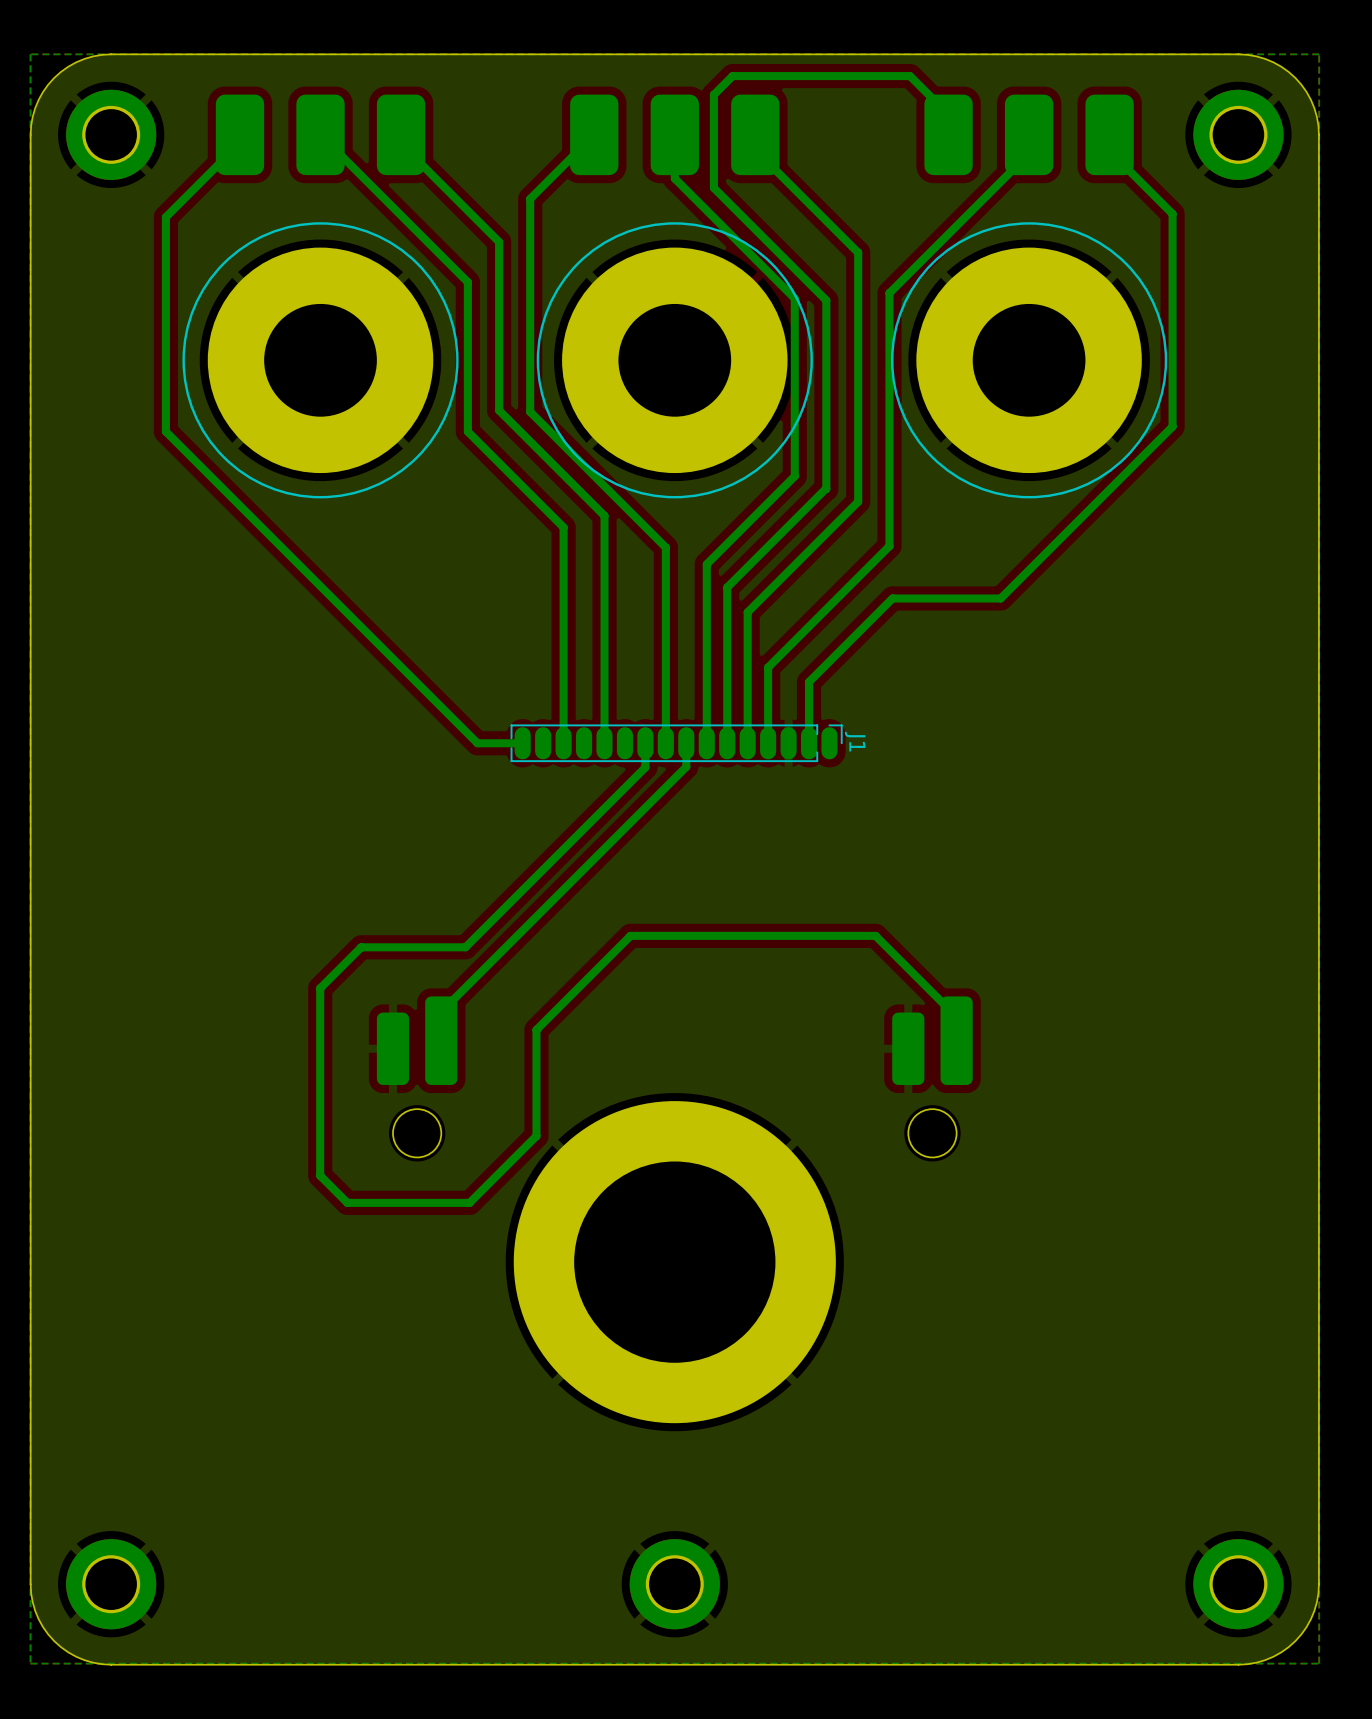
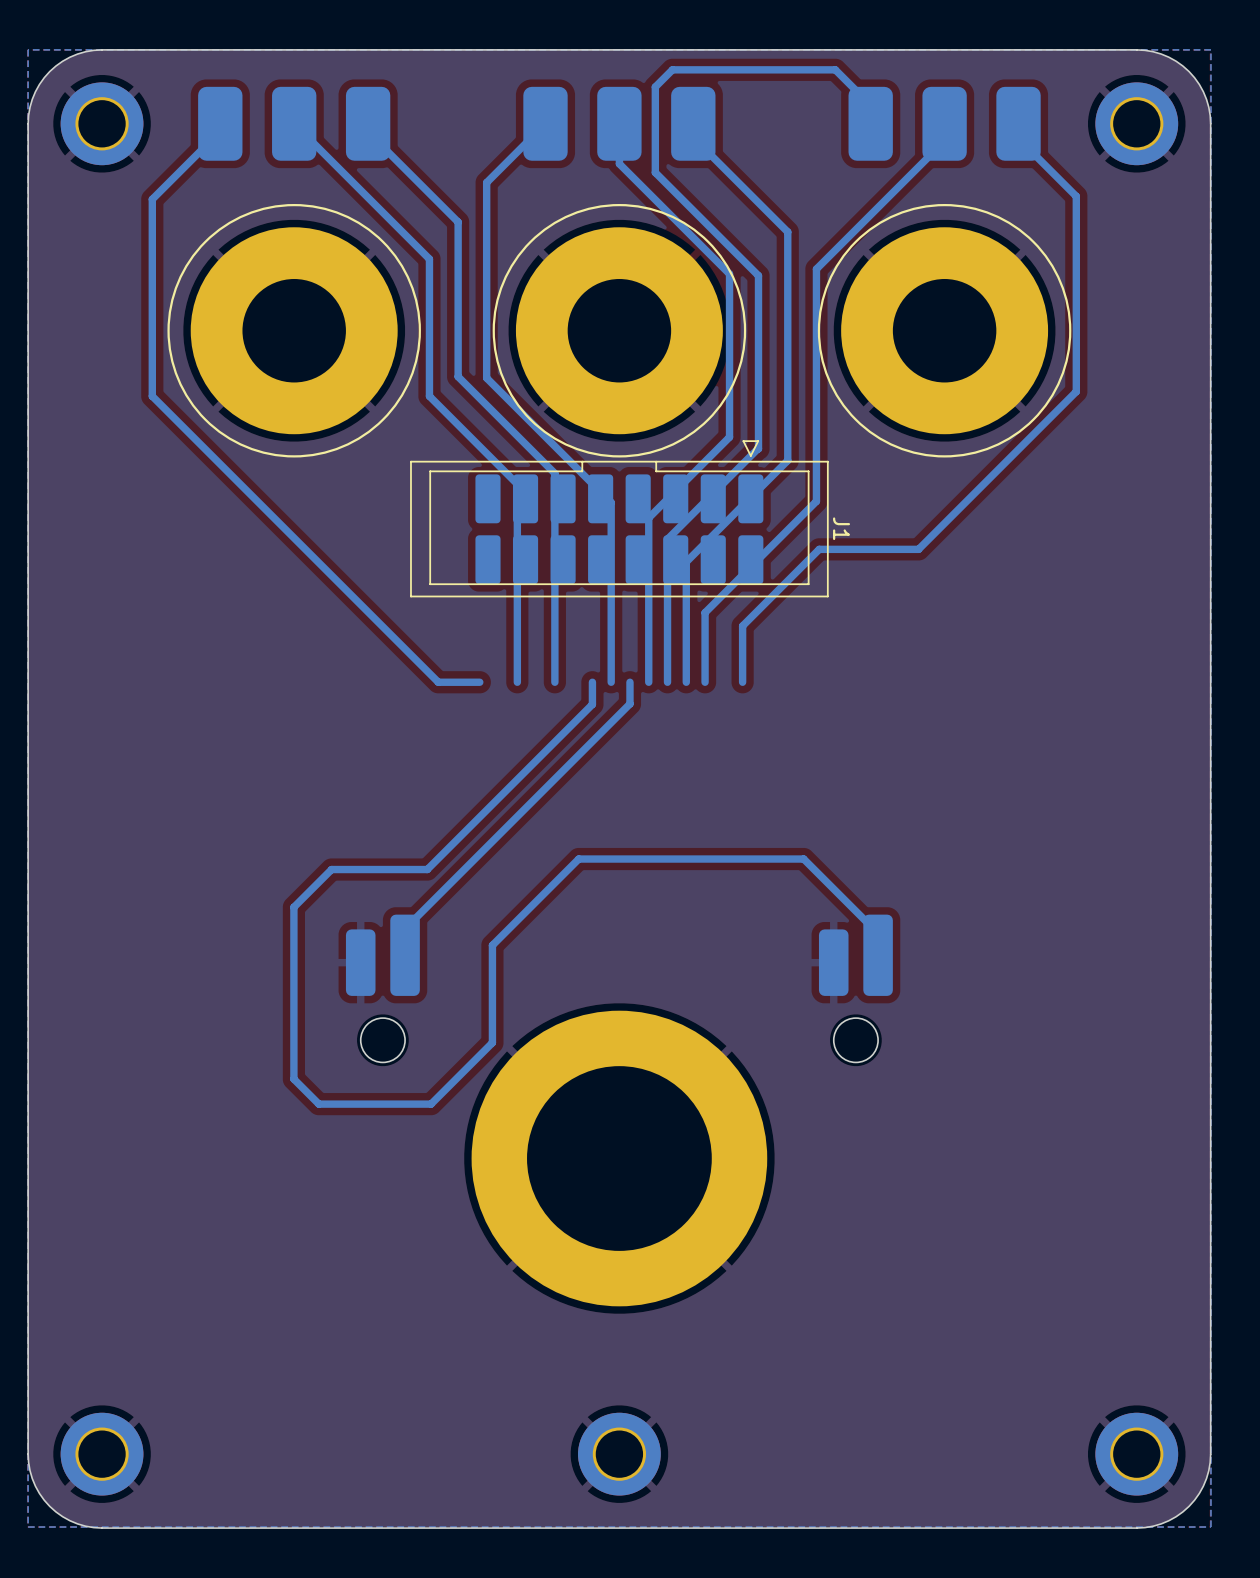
J1 footprint: [510, 724, 843, 763] -> [410, 440, 829, 598]
J1 name position: J1 (855, 741) -> J1 (841, 528)

